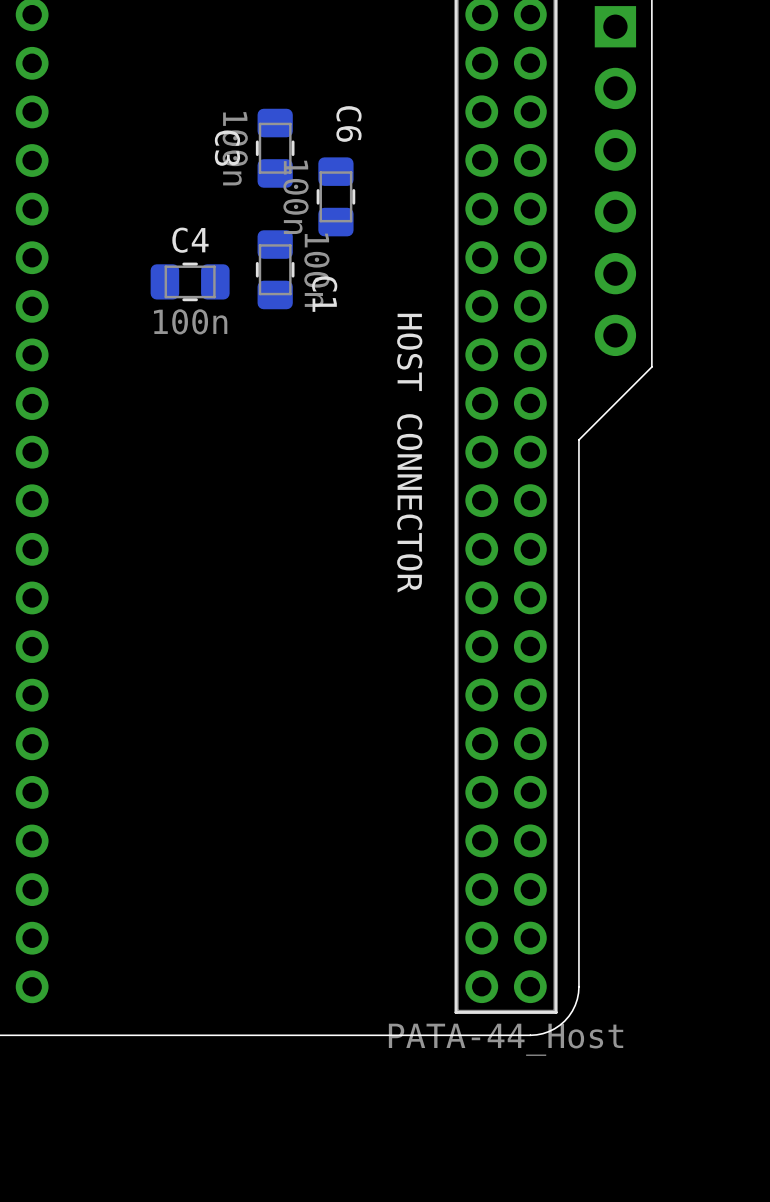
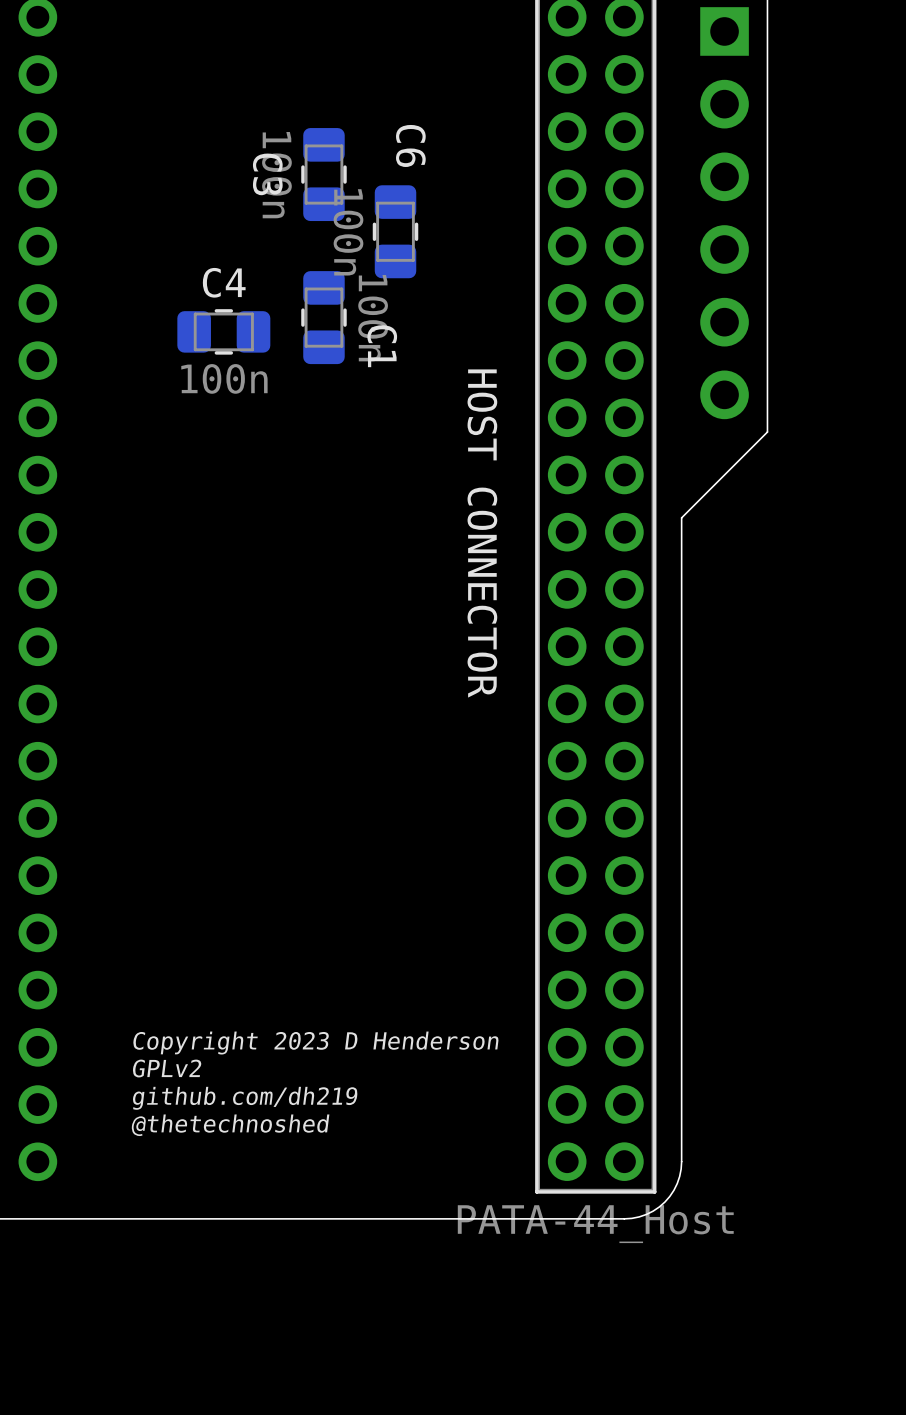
text: none -> Copyright 2023 D Henderson (315, 1043)
text: none -> GPLv2 (167, 1068)
text: none -> github.com/dh219 (245, 1098)
text: none -> @thetechnoshed (230, 1125)

